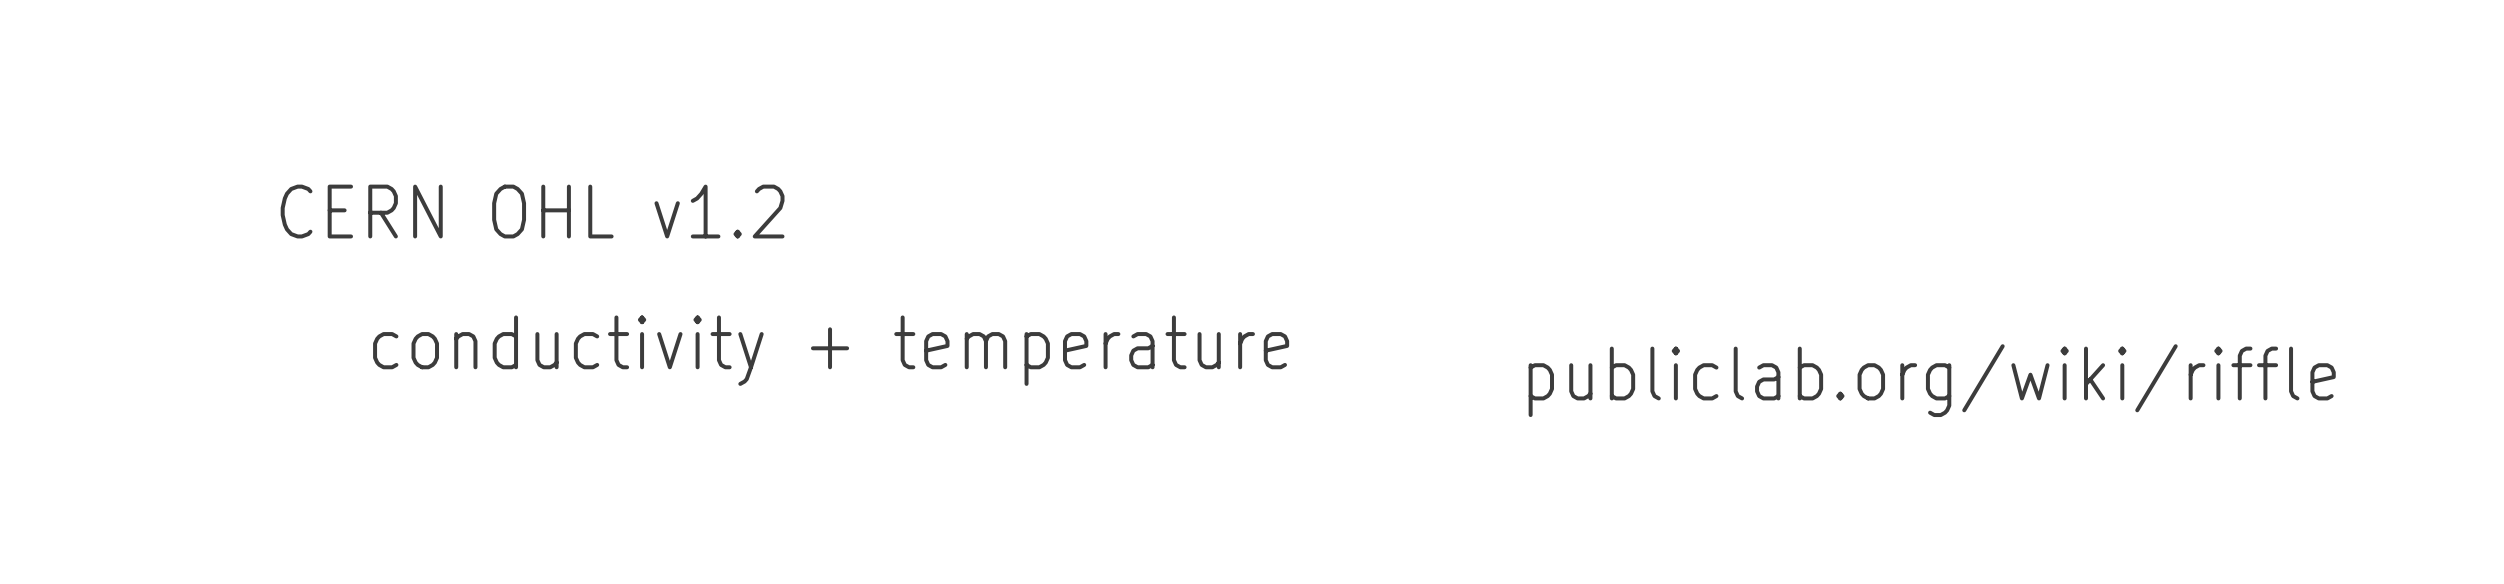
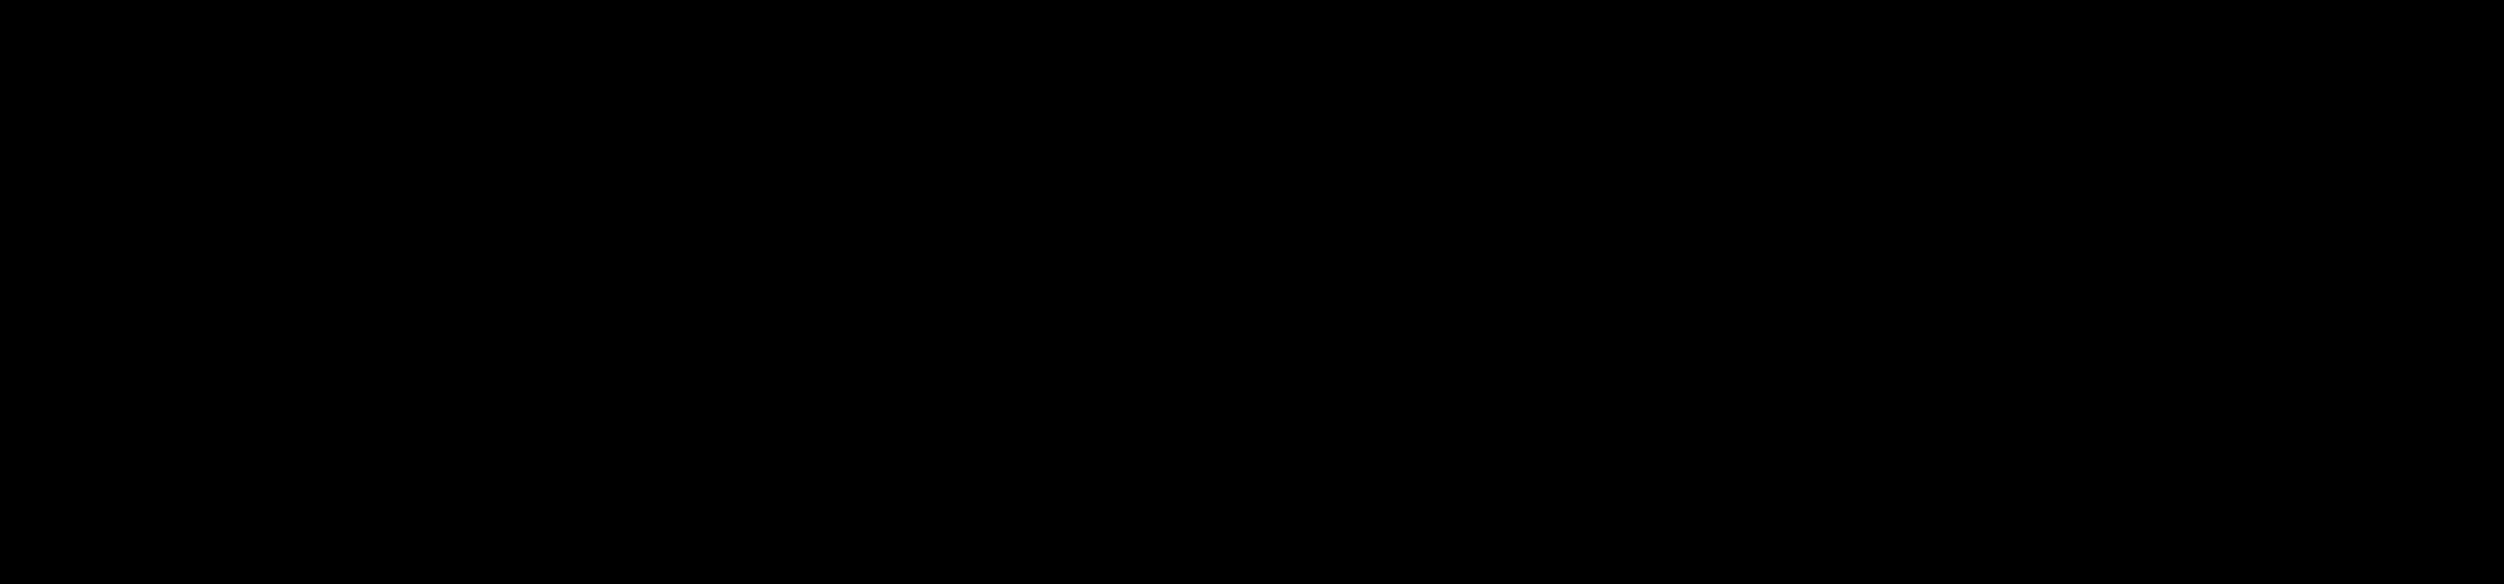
text: CERN OHL v1.2 (532, 211) -> none
text: conductivity + temperature (831, 350) -> none
text: publiclab.org/wiki/riffle (1932, 380) -> none

